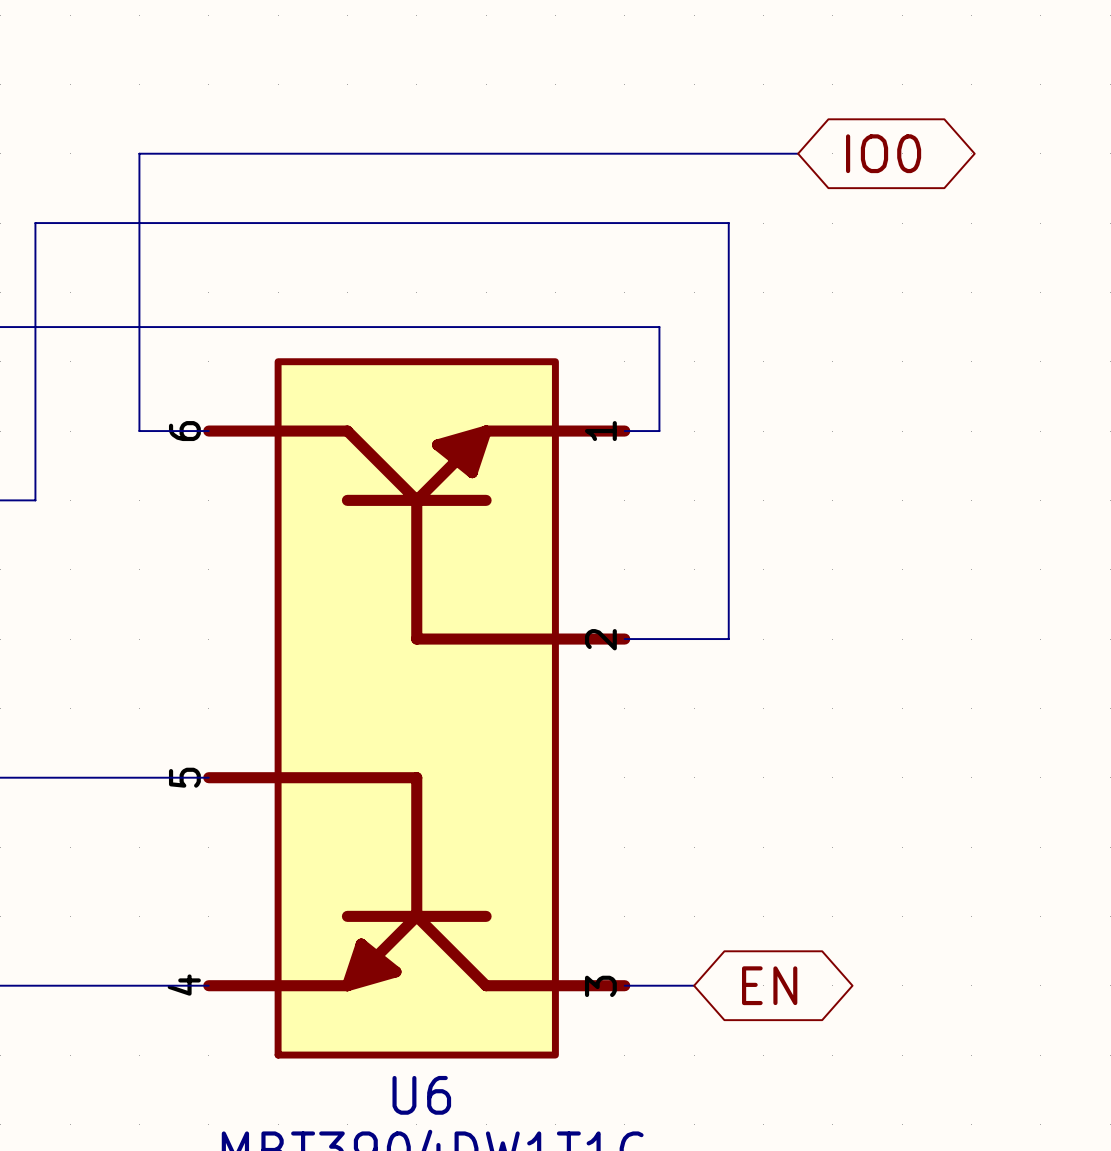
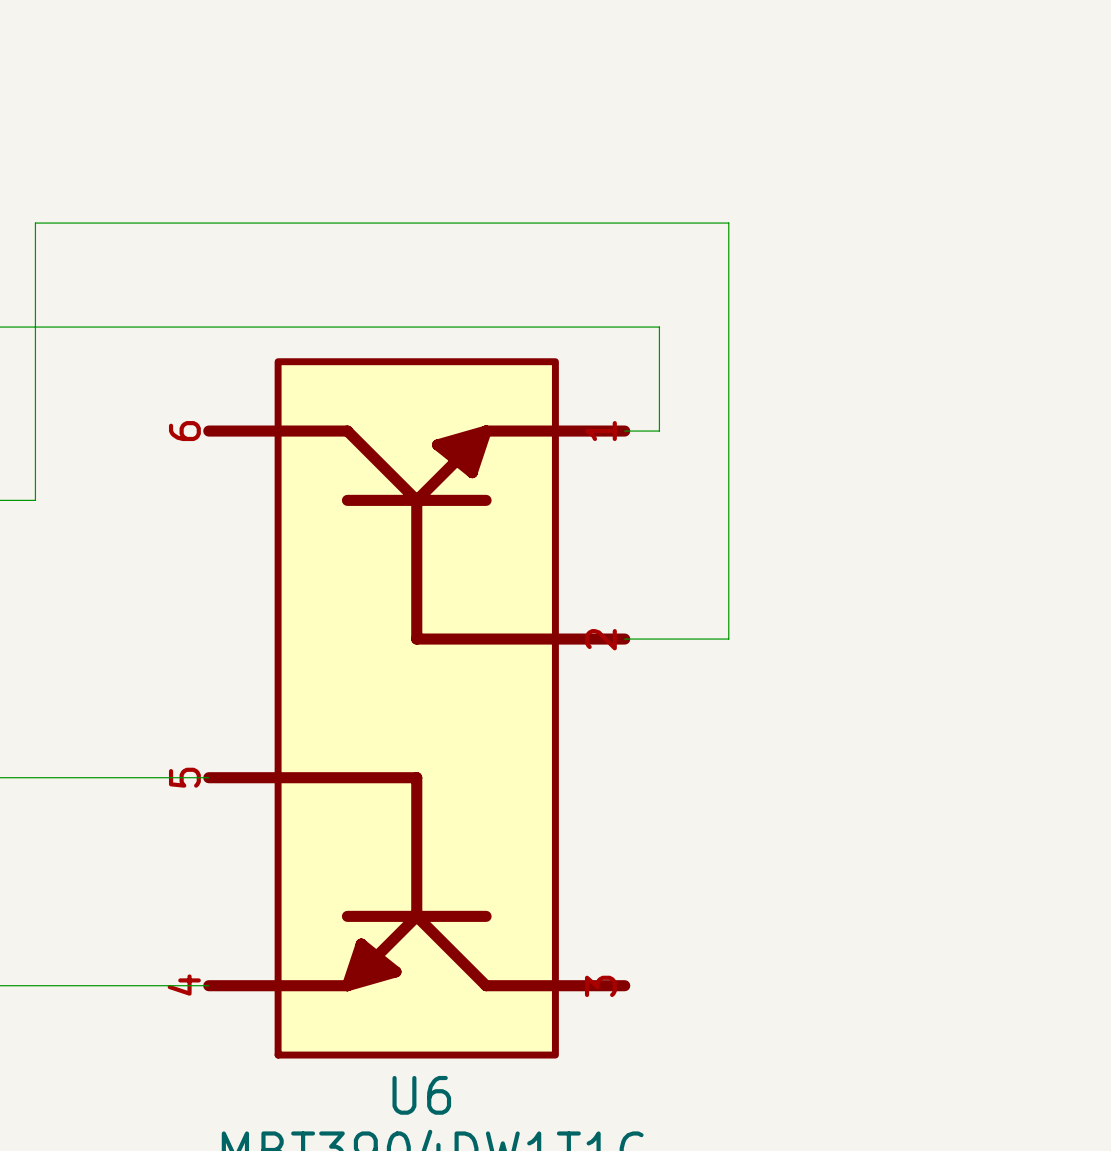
wire: (798, 153) (139, 153) (139, 431) (208, 431) -> none
global label: IO0 (883, 153) -> none
wire: (624, 985) (694, 985) -> none
global label: EN (769, 985) -> none

